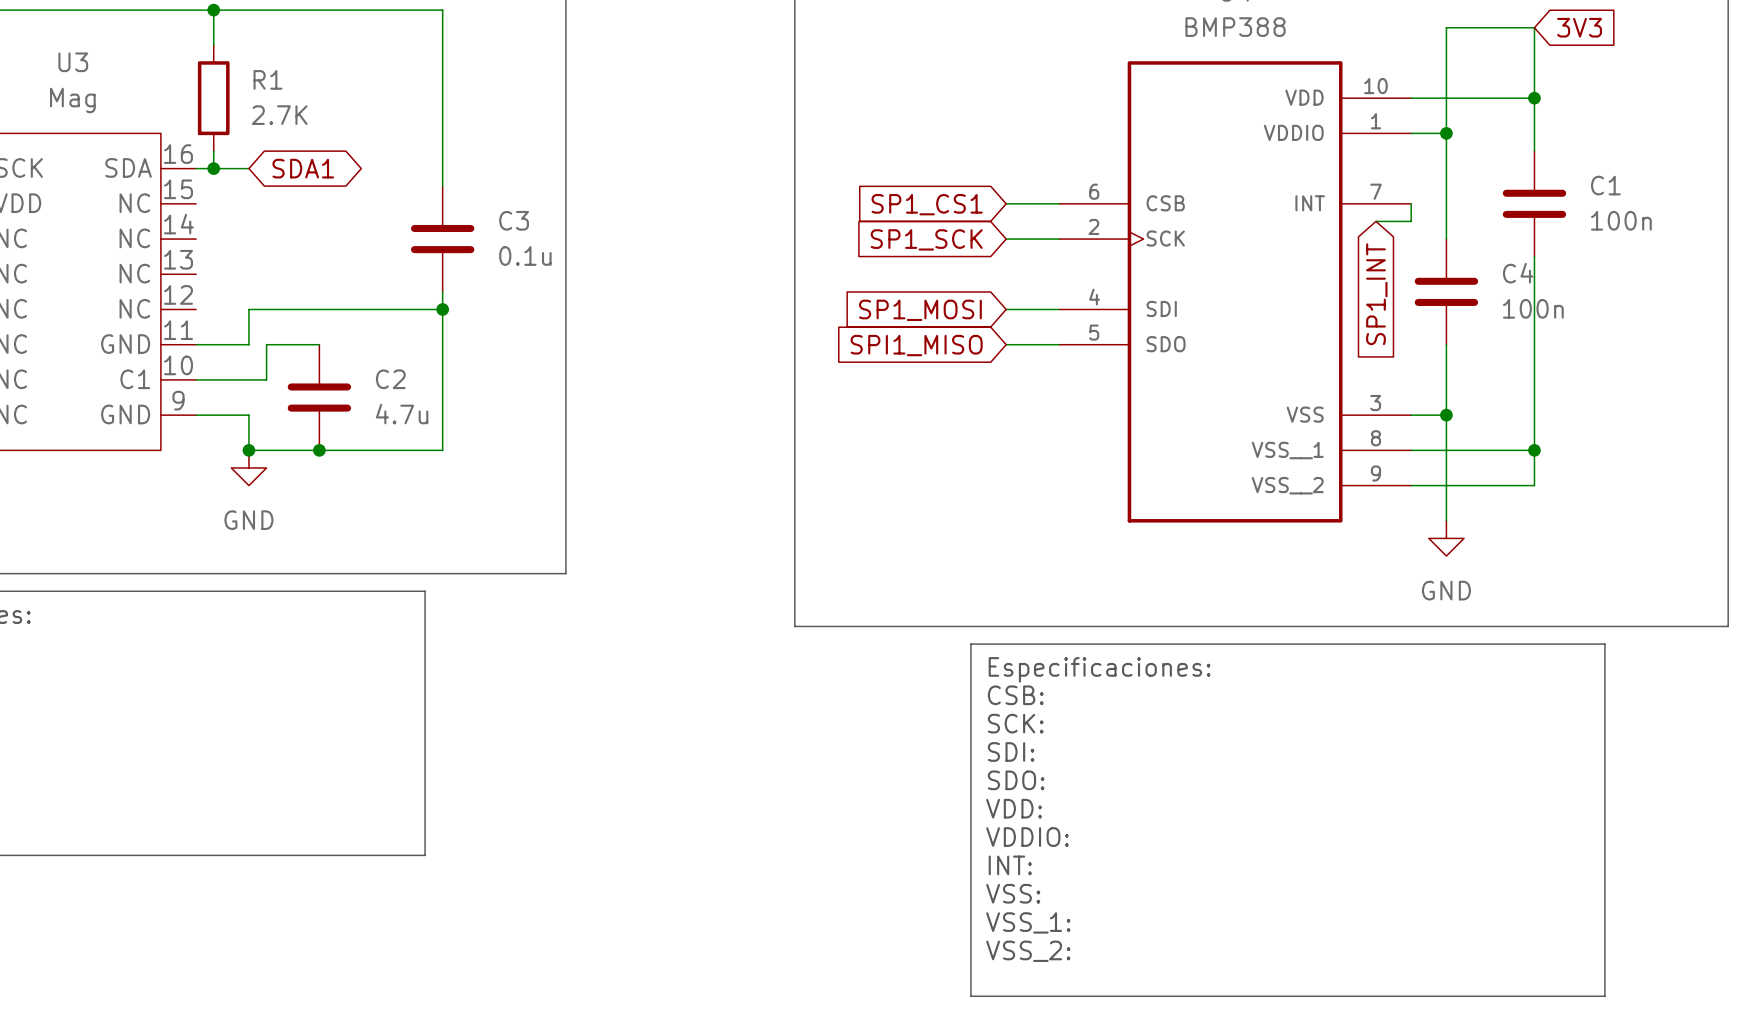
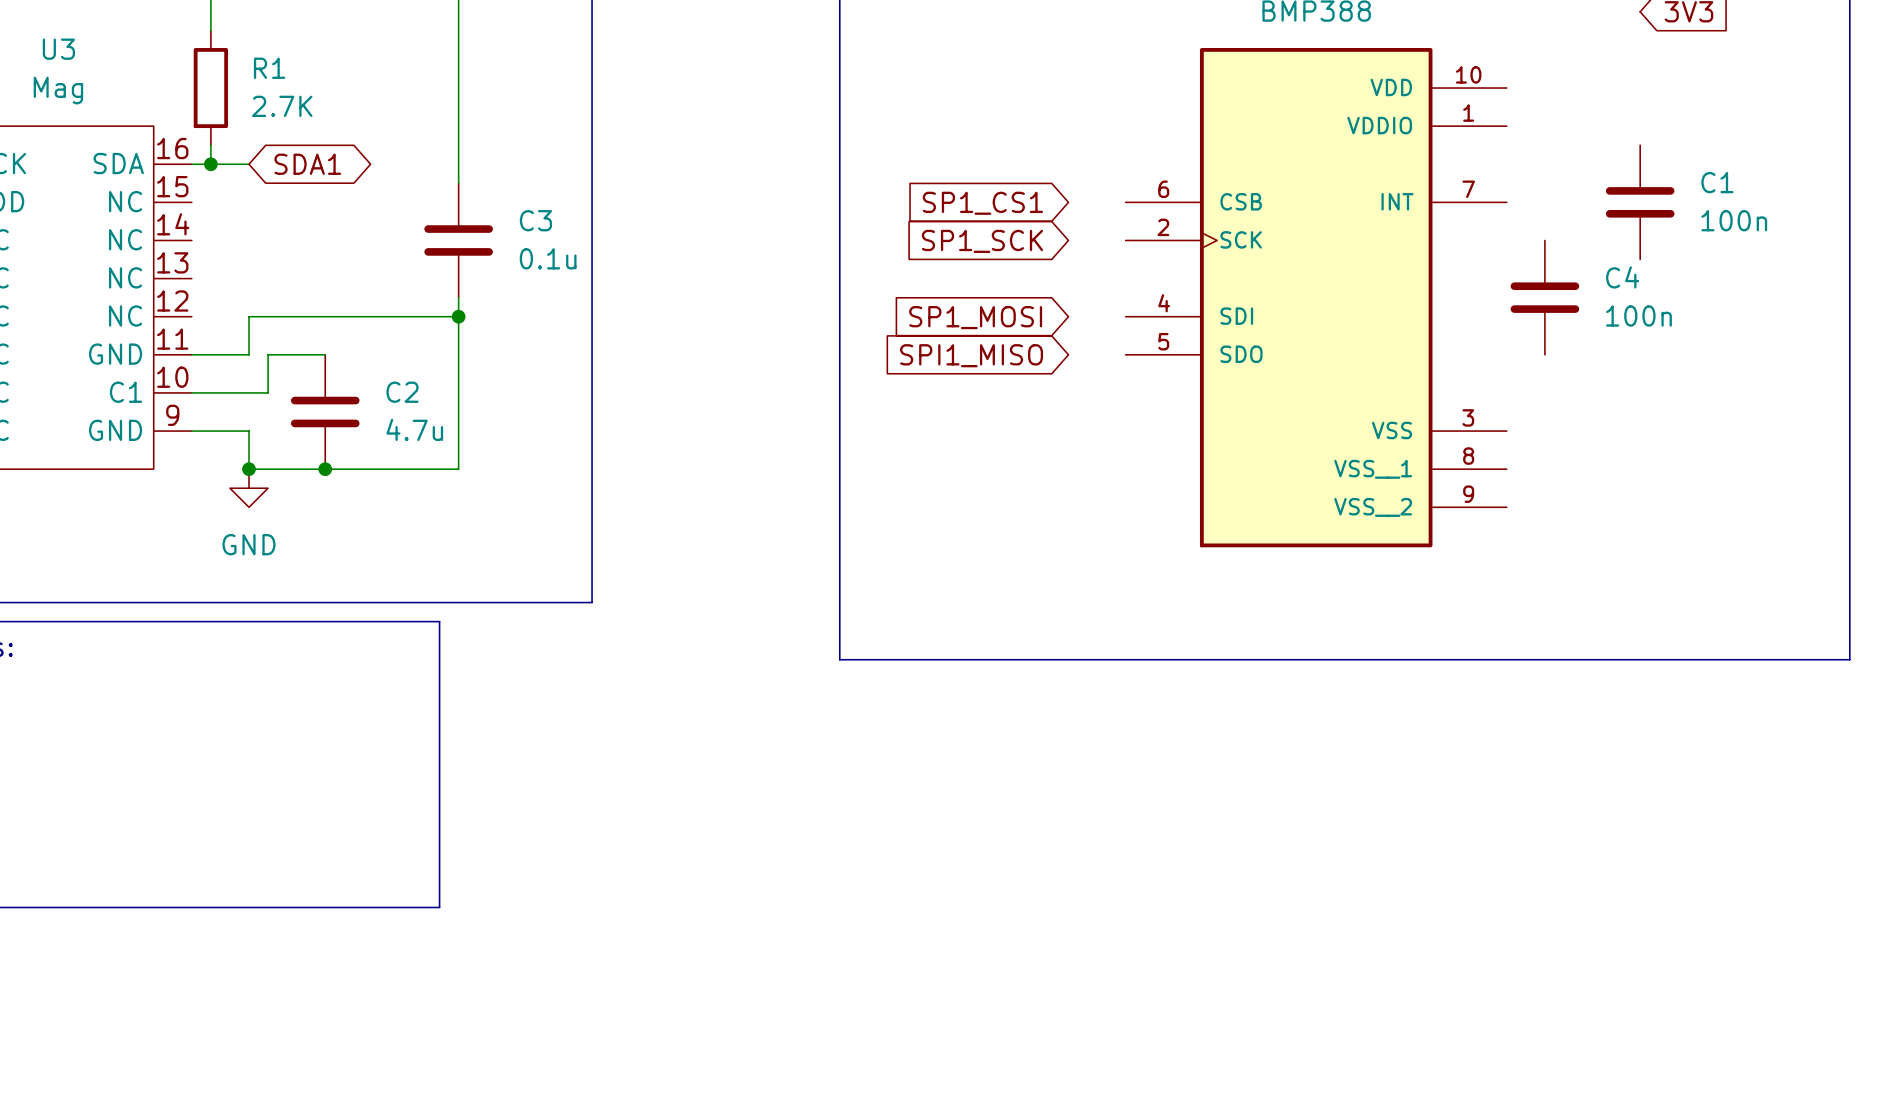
wire: (1411, 98) (1534, 98) -> none
junction: (1534, 98) -> none
wire: (1411, 133) (1446, 133) -> none
junction: (1446, 133) -> none
wire: (1534, 151) (1534, 27) (1446, 27) (1446, 239) -> none
wire: (1006, 203) (1059, 203) -> none
wire: (1411, 203) (1411, 221) (1375, 221) -> none
wire: (1006, 239) (1059, 239) -> none
wire: (1534, 256) (1534, 485) (1411, 485) -> none
global label: SP1_INT (1376, 294) -> none
wire: (1006, 309) (1059, 309) -> none
wire: (1006, 344) (1059, 344) -> none
wire: (1446, 344) (1446, 520) -> none
wire: (1411, 415) (1446, 415) -> none
junction: (1446, 415) -> none
wire: (1411, 450) (1534, 450) -> none
junction: (1534, 450) -> none
power symbol: GND (1446, 538) -> none
line: (970, 644) (1604, 644) (1604, 996) (970, 996) (970, 644) -> none
text: Especificaciones: (1099, 669) -> none
text: CSB: (1015, 695) -> none
text: SCK: (1015, 723) -> none
text: SDI: (1011, 751) -> none
text: SDO: (1016, 780) -> none
text: VDD: (1014, 808) -> none
text: VDDIO: (1027, 837) -> none
text: INT: (1010, 865) -> none
text: VSS: (1013, 893) -> none
text: VSS_1: (1028, 922) -> none
text: VSS_2: (1028, 951) -> none

